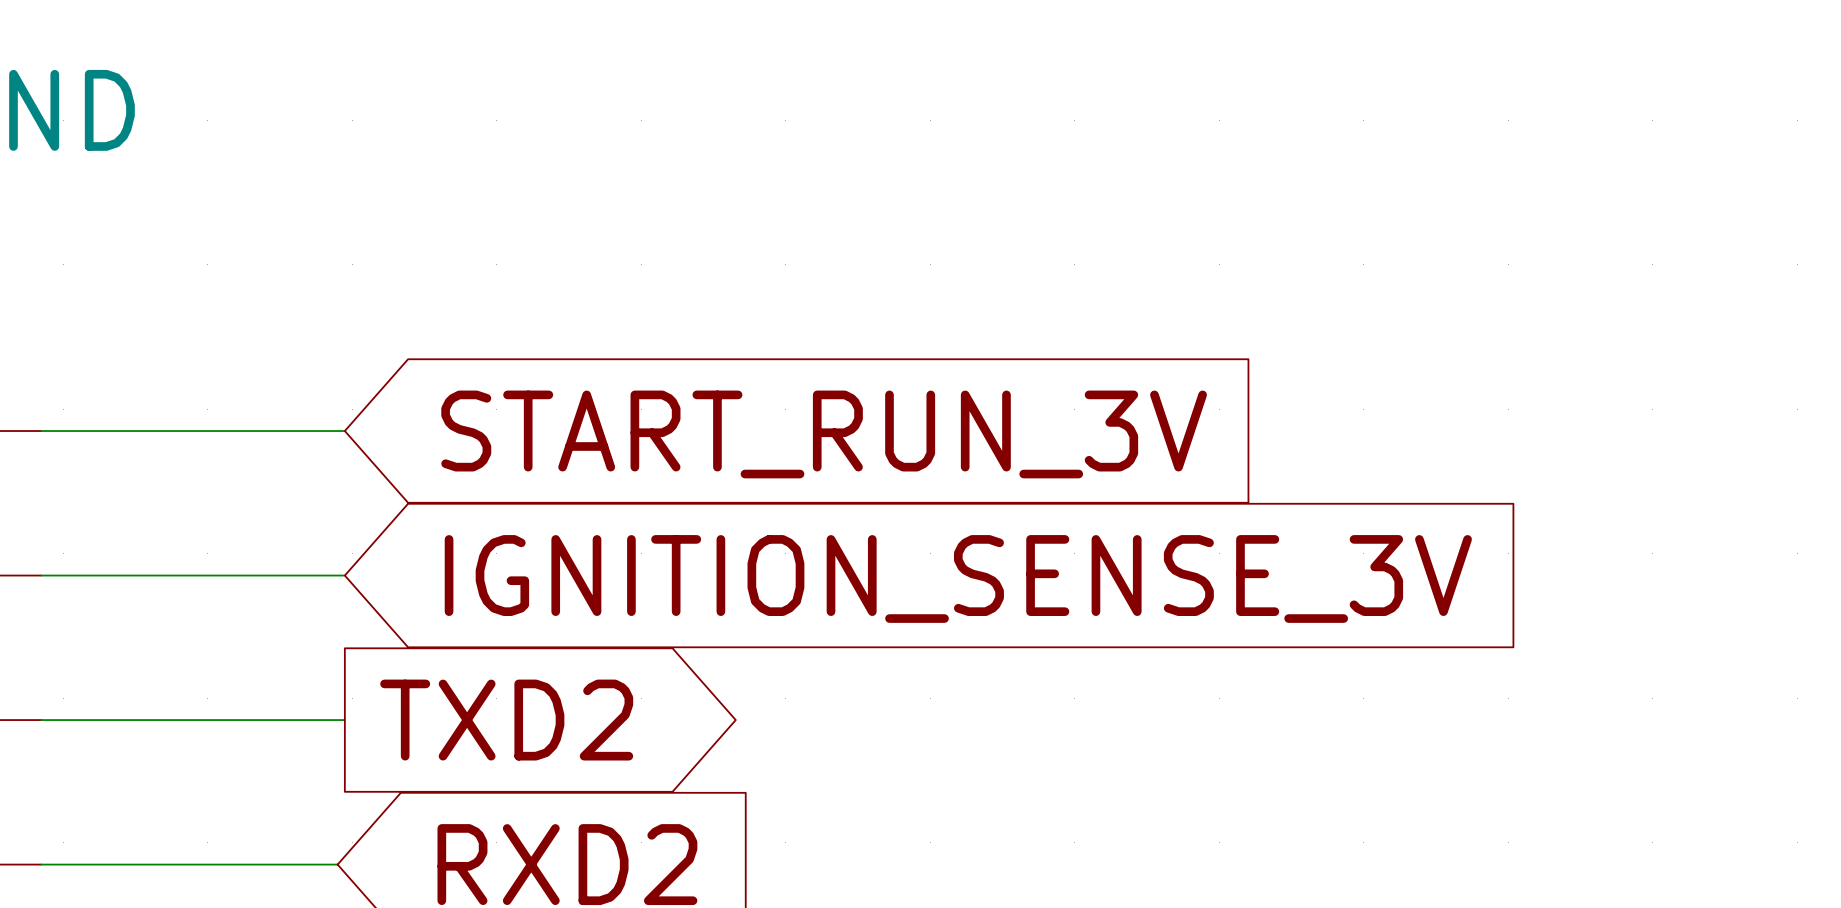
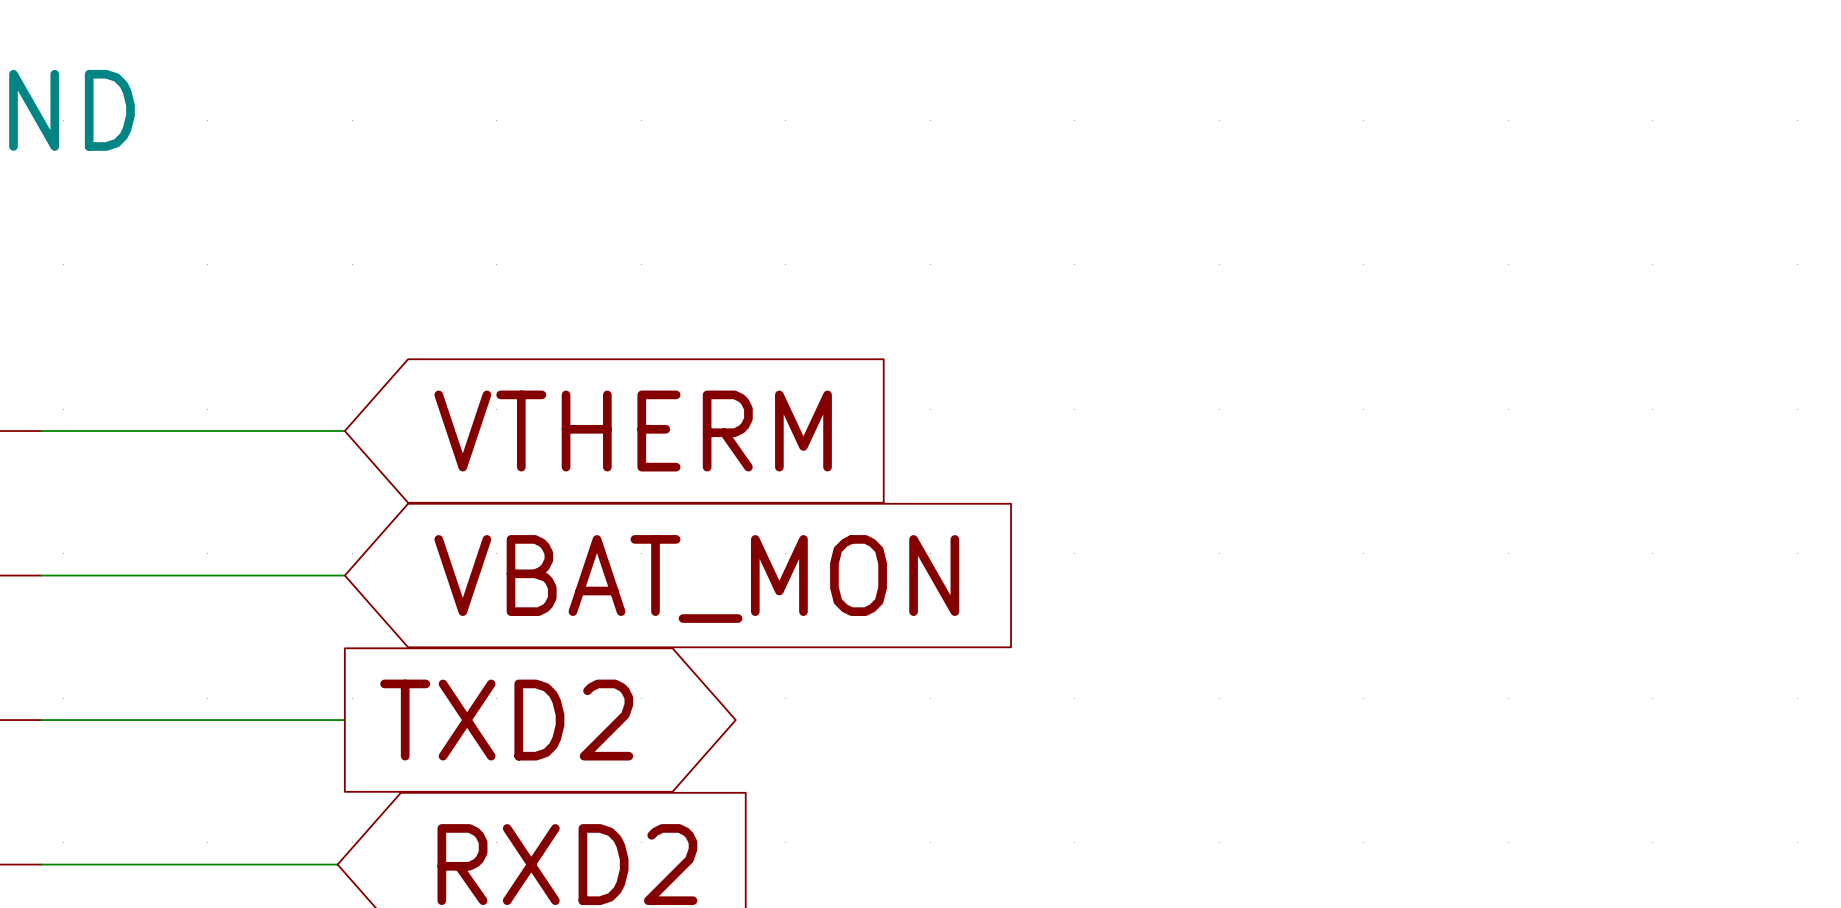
global label: START_RUN_3V (824, 434) -> VTHERM (633, 431)
global label: IGNITION_SENSE_3V (958, 578) -> VBAT_MON (696, 578)

